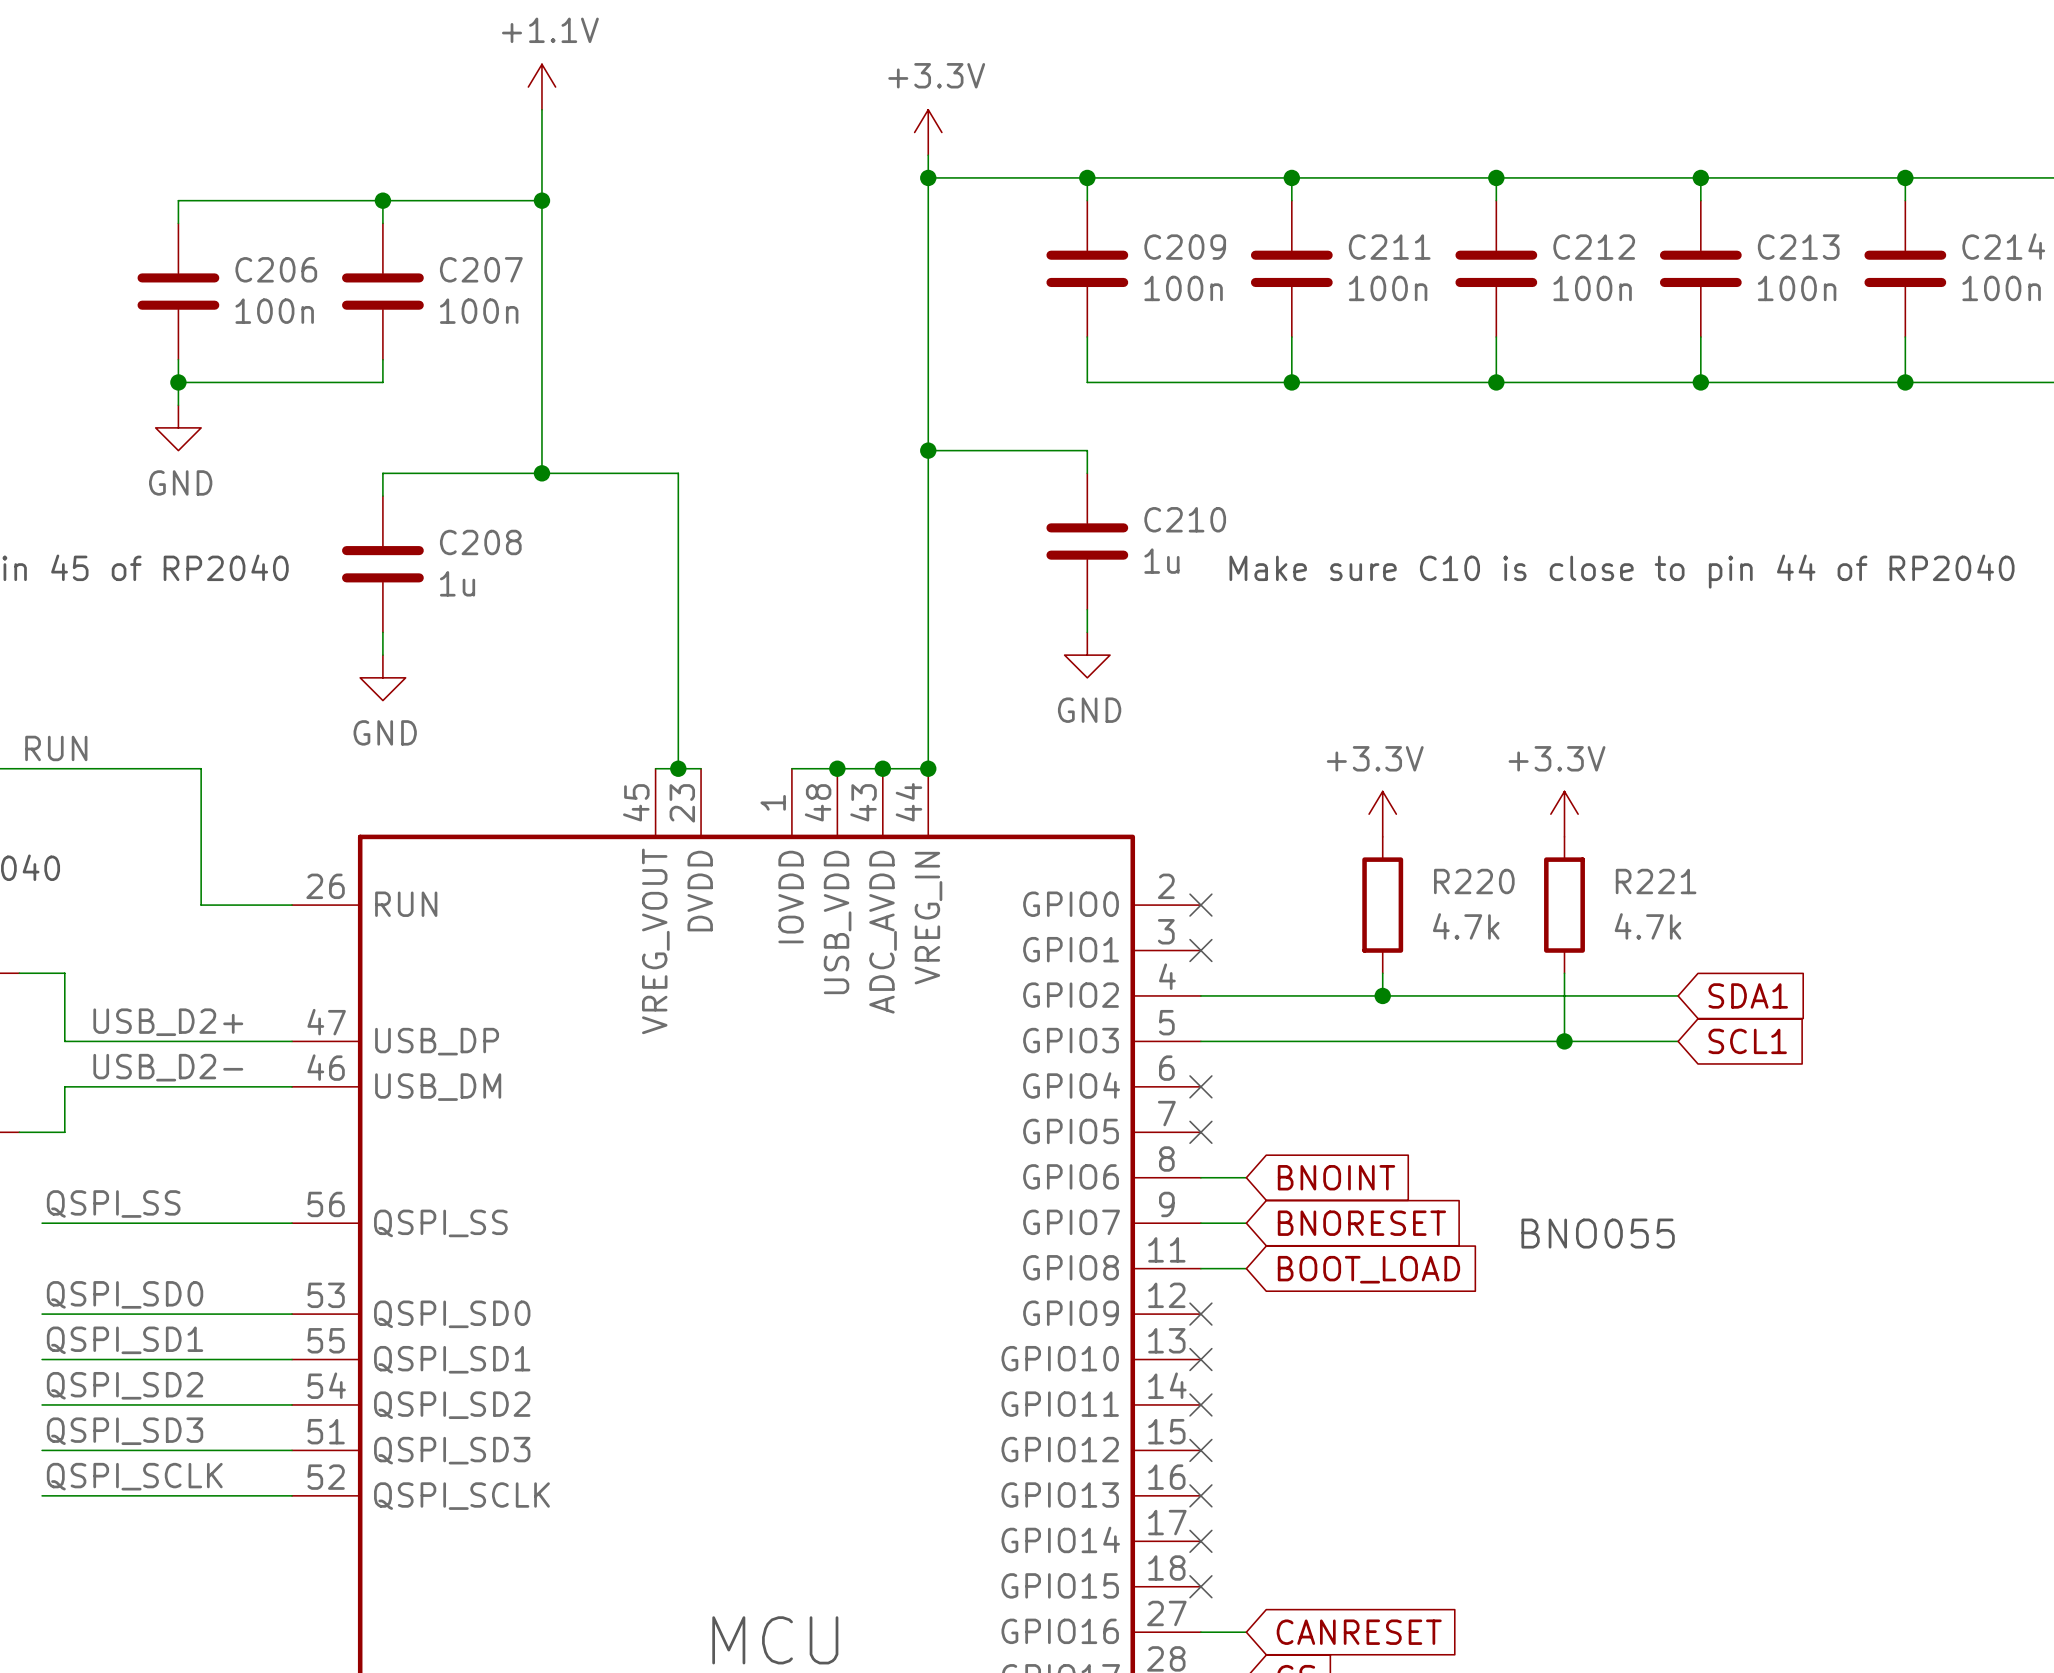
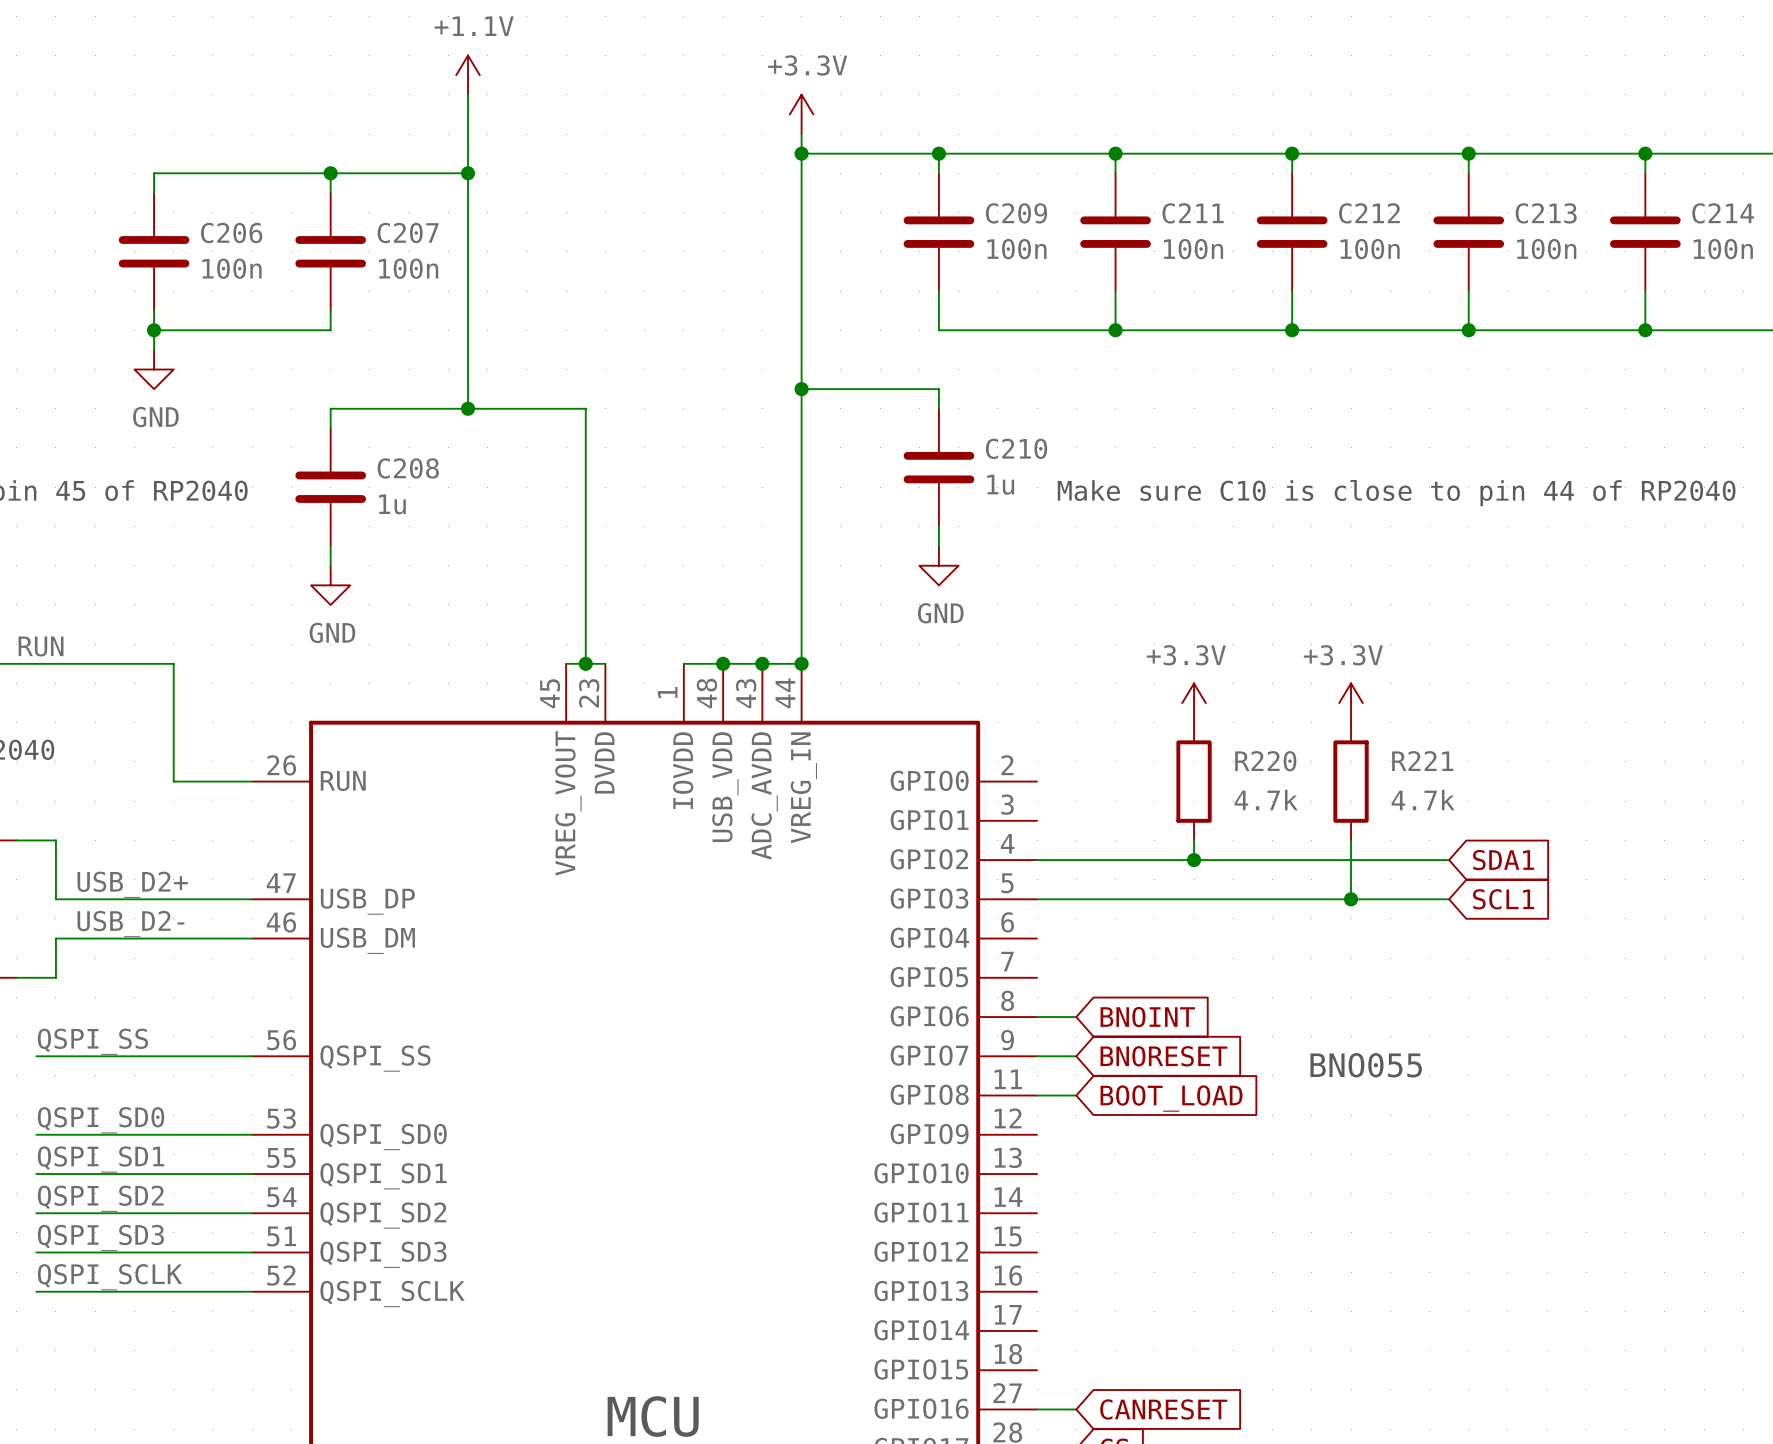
no-connect mark: (1200, 905) -> none
no-connect mark: (1200, 950) -> none
no-connect mark: (1200, 1086) -> none
no-connect mark: (1200, 1132) -> none
no-connect mark: (1200, 1314) -> none
no-connect mark: (1200, 1359) -> none
no-connect mark: (1200, 1404) -> none
no-connect mark: (1200, 1450) -> none
no-connect mark: (1200, 1495) -> none
no-connect mark: (1200, 1541) -> none
no-connect mark: (1200, 1586) -> none

